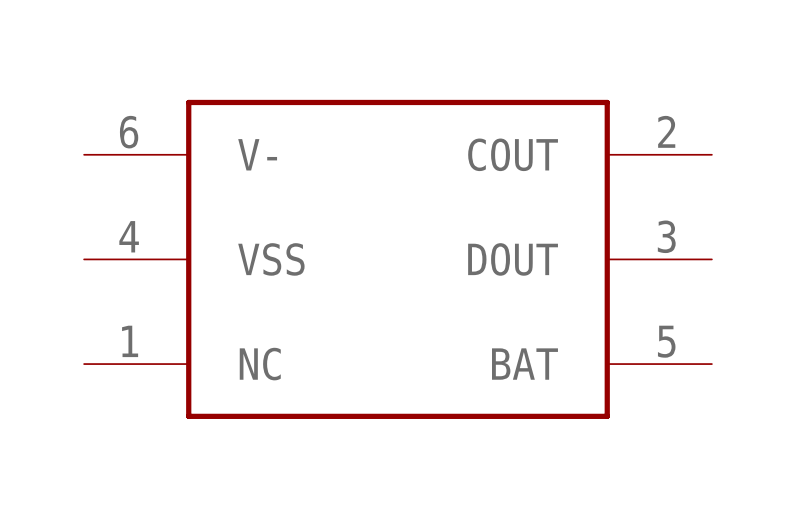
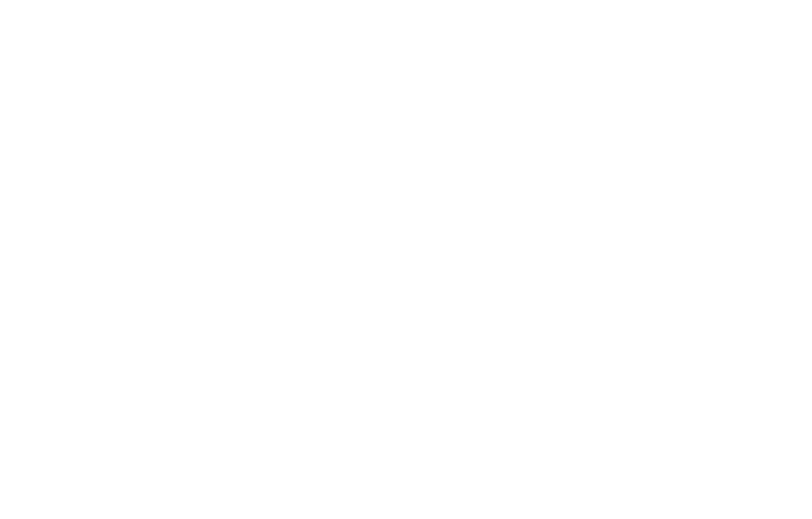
part: (397, 259) -> none

